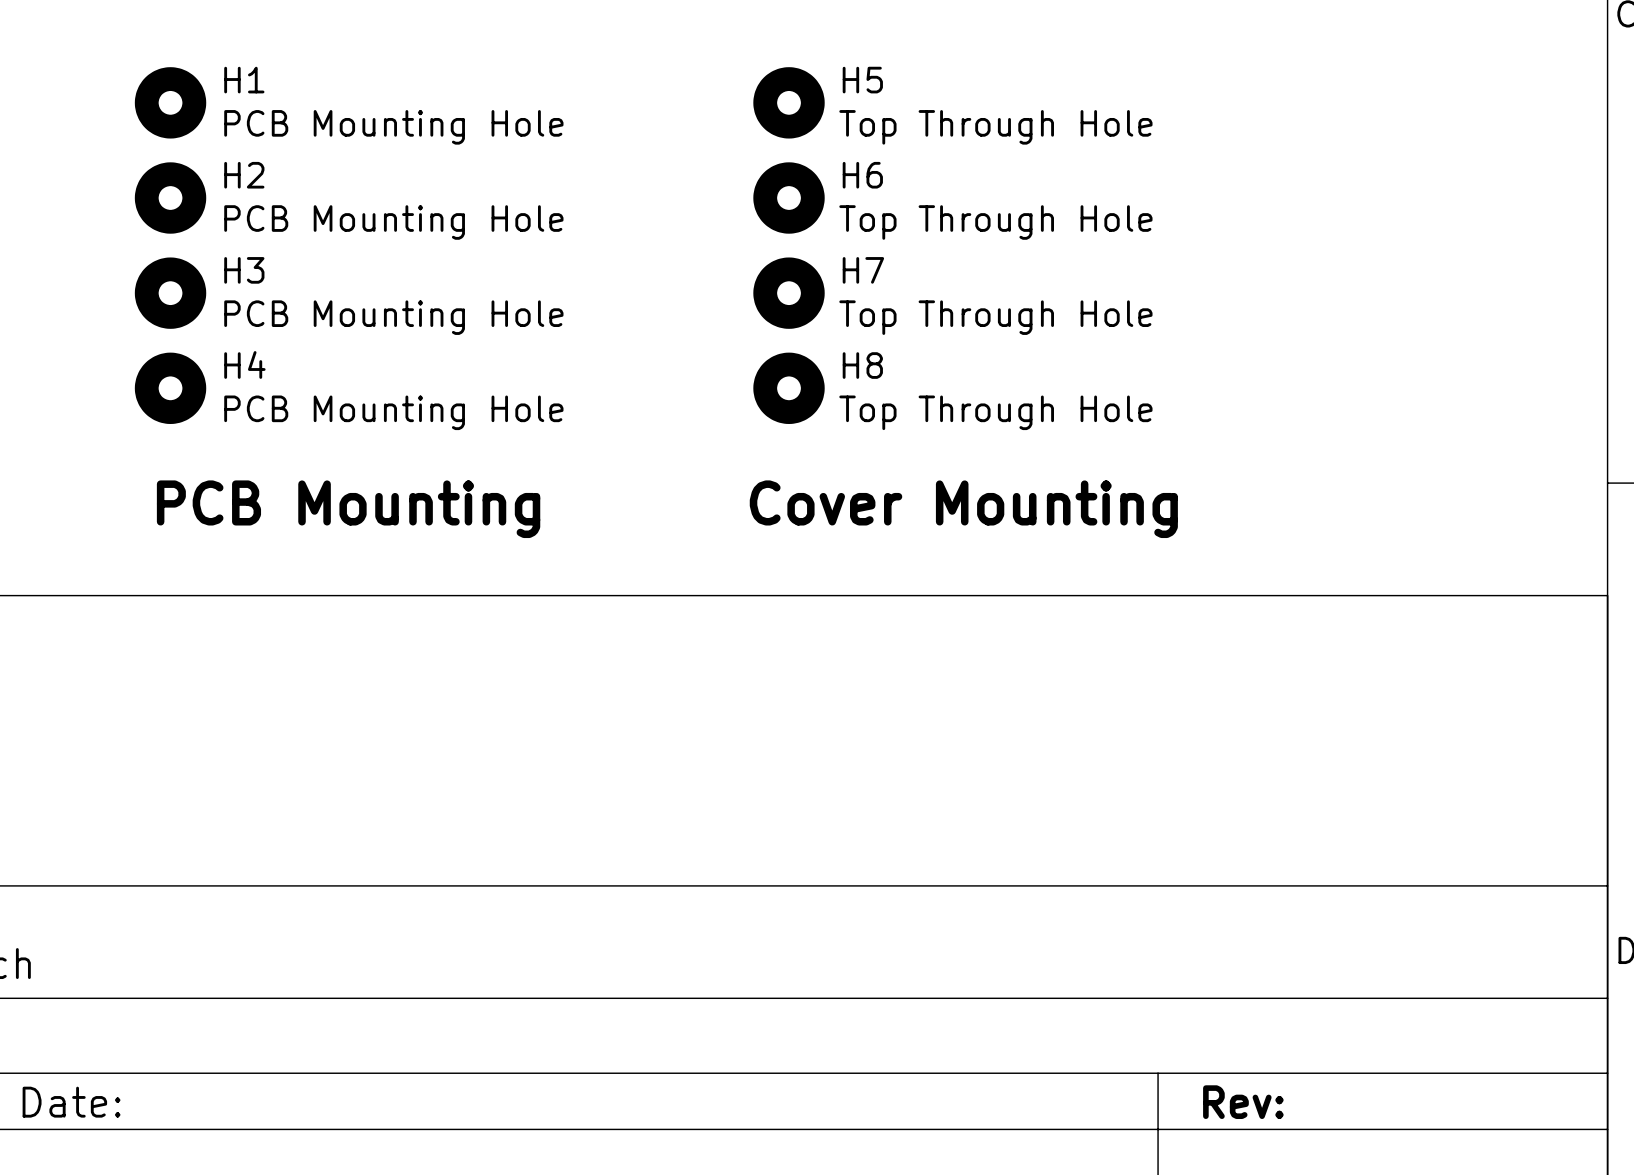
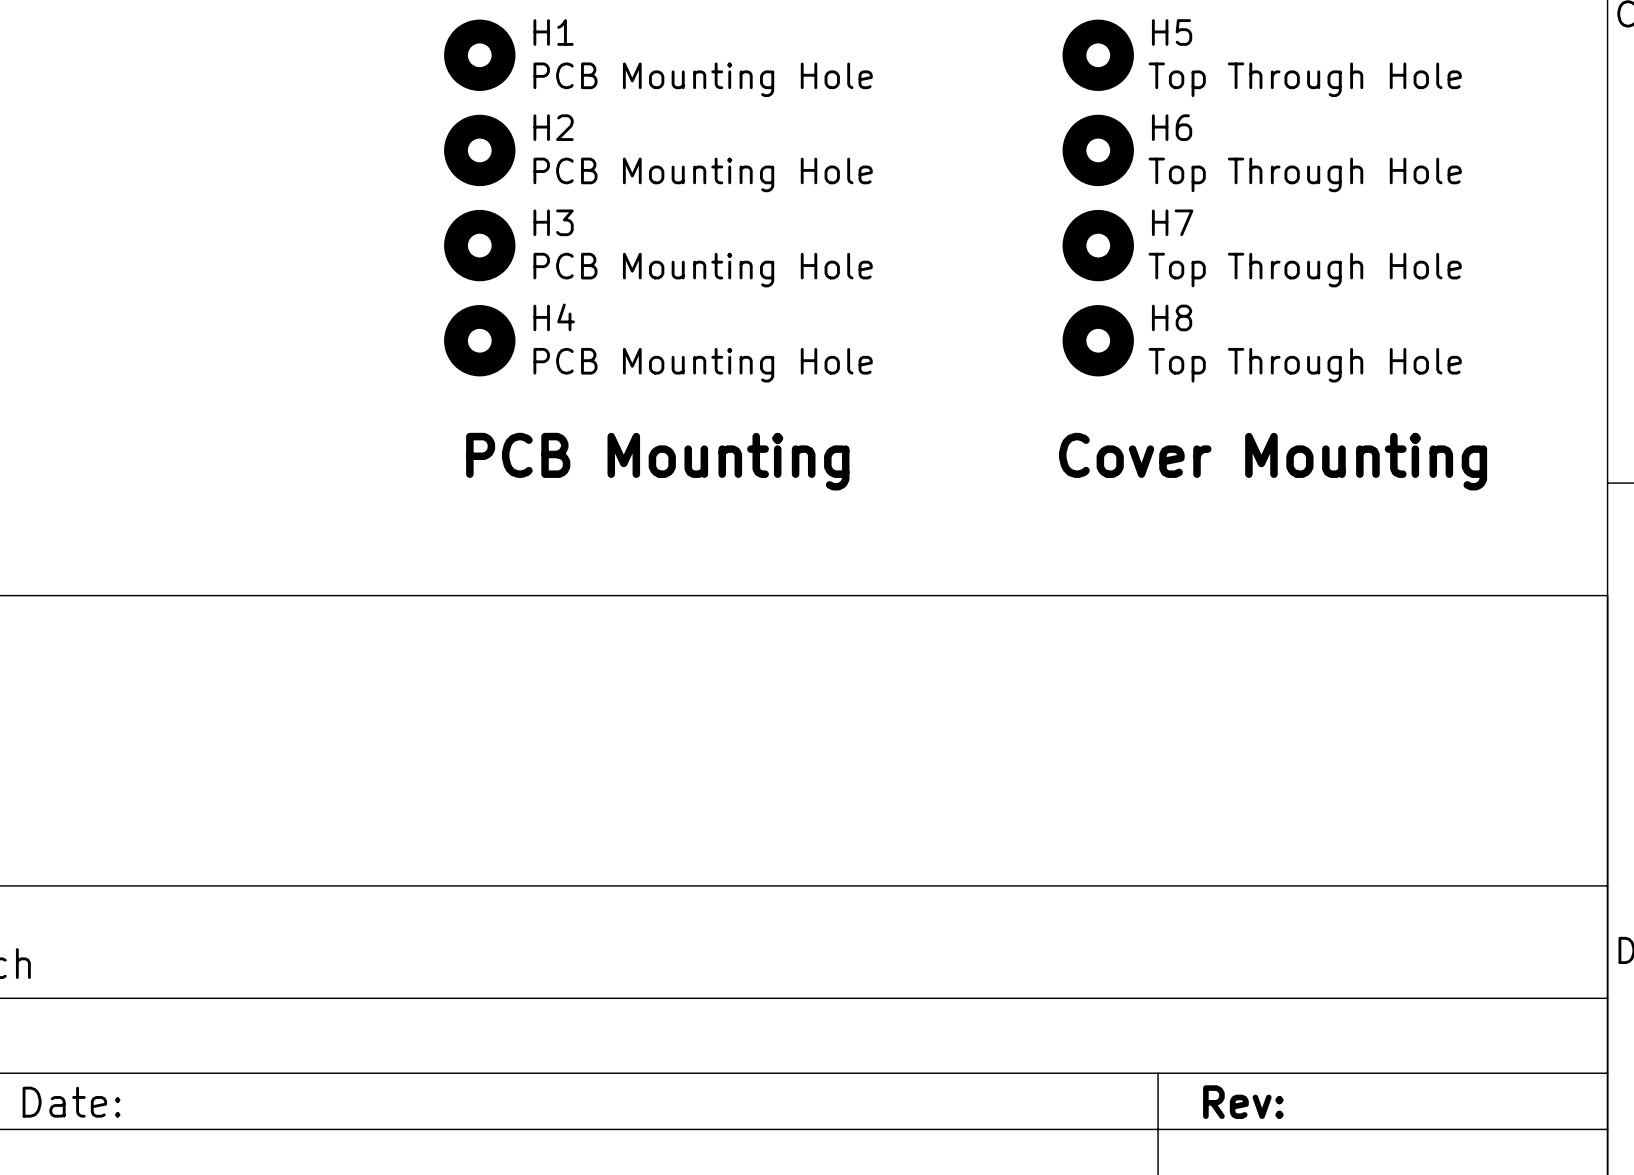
H1 position: (170, 102) -> (479, 55)
H5 position: (789, 102) -> (1098, 55)
H2 position: (170, 198) -> (479, 150)
H6 position: (789, 198) -> (1098, 150)
H3 position: (170, 293) -> (479, 245)
H7 position: (789, 293) -> (1098, 245)
H4 position: (170, 388) -> (479, 340)
H8 position: (789, 388) -> (1098, 340)
text position: PCB Mounting (348, 509) -> PCB Mounting (657, 461)
text position: Cover Mounting (963, 509) -> Cover Mounting (1273, 461)

